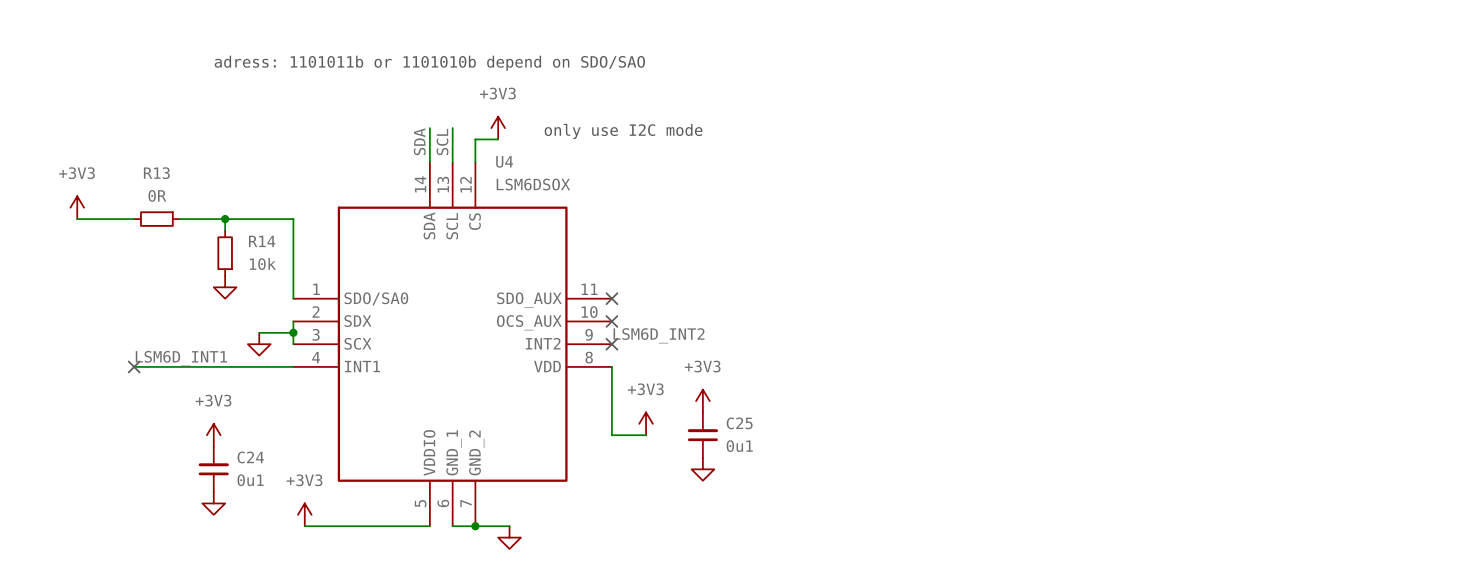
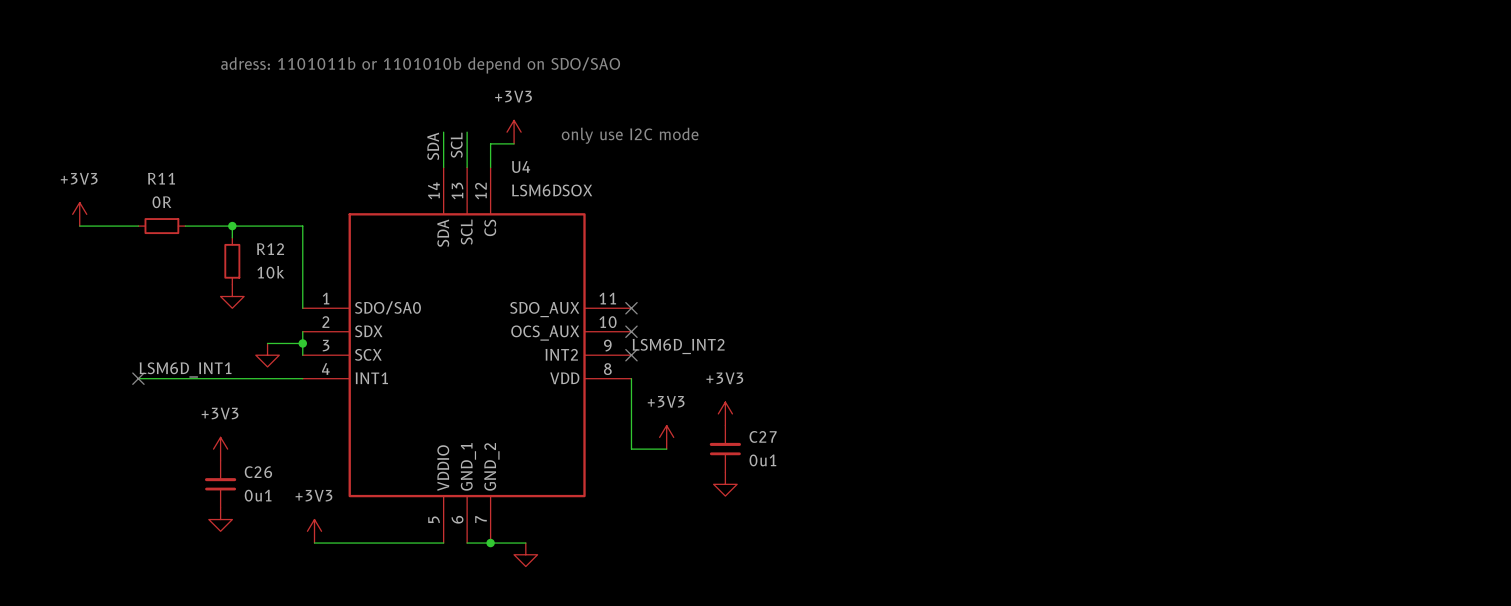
R13 name: R13 (156, 173) -> R11 (161, 178)
R14 name: R14 (262, 241) -> R12 (270, 249)
C25 name: C25 (739, 423) -> C27 (763, 436)
C24 name: C24 (250, 457) -> C26 (258, 472)

